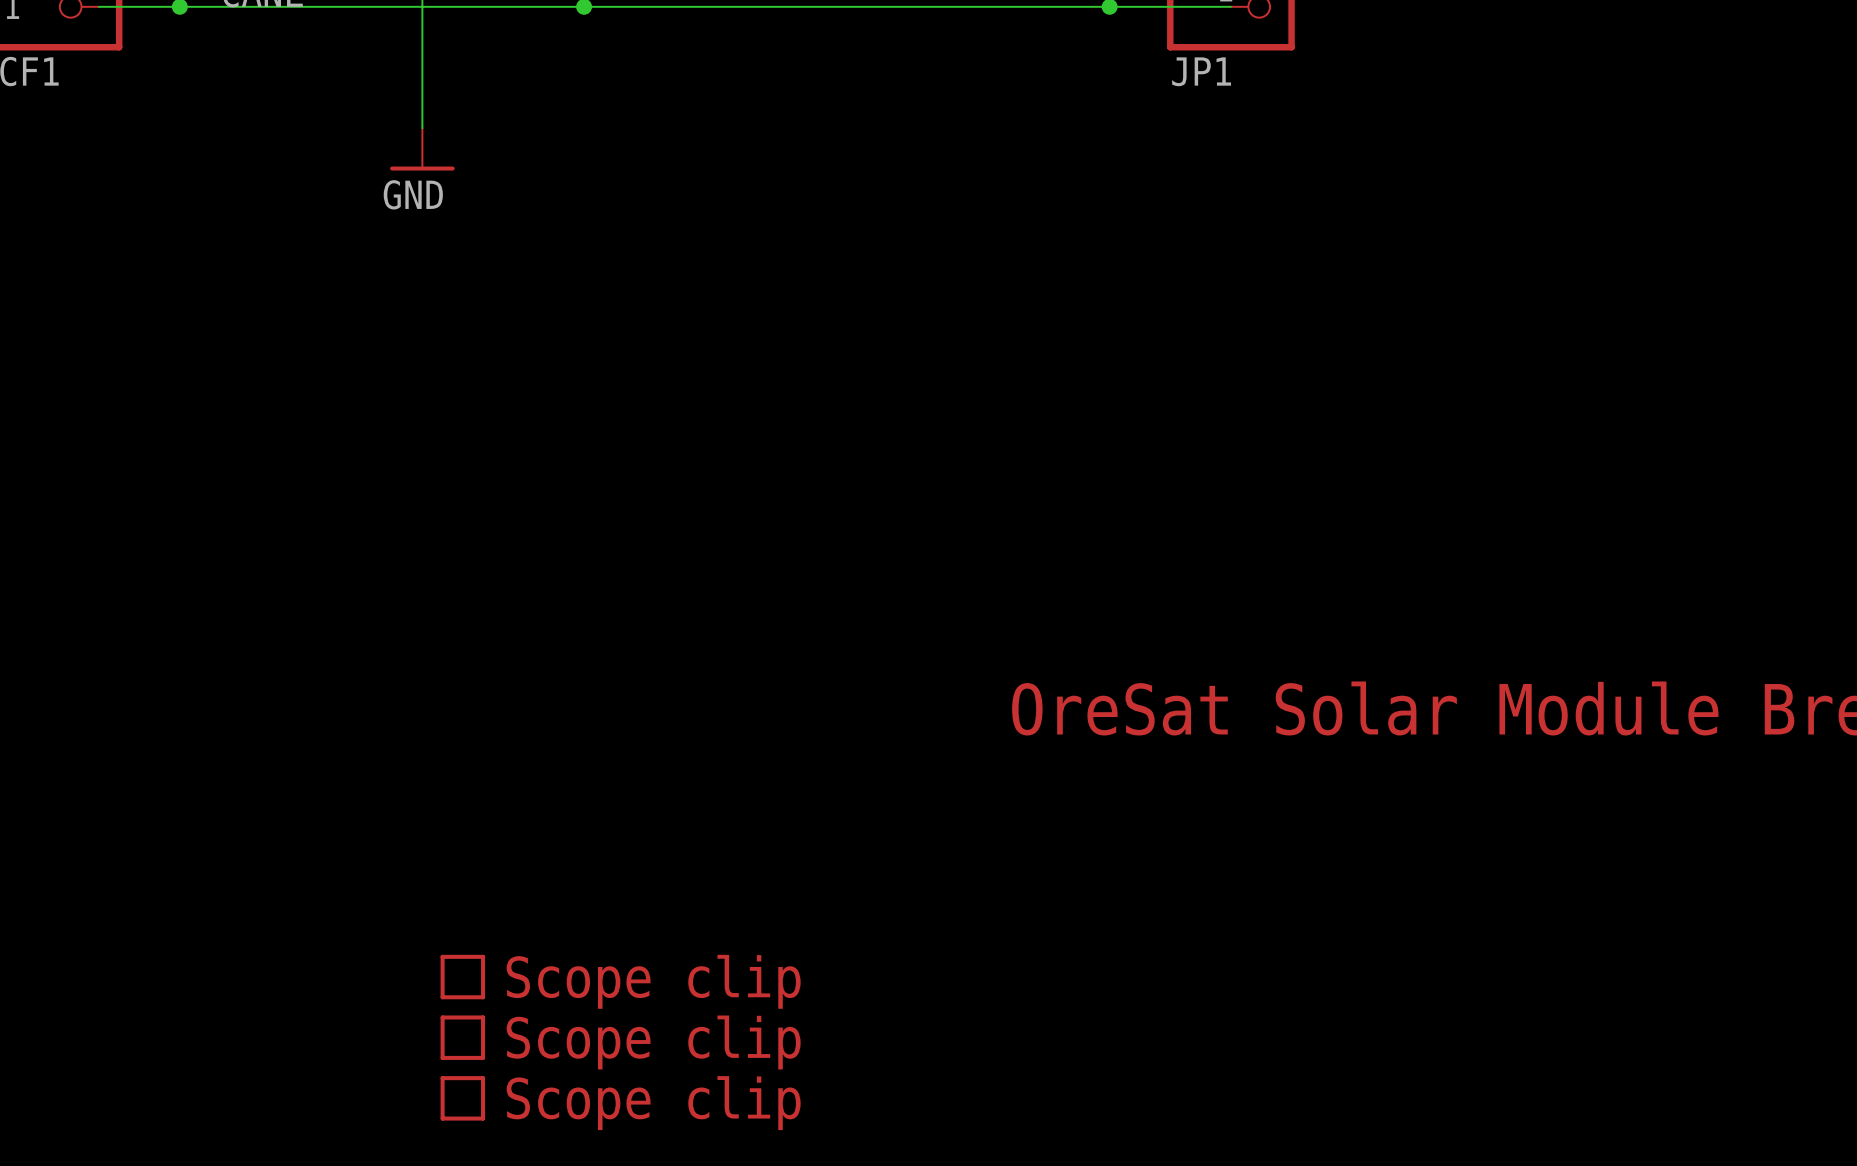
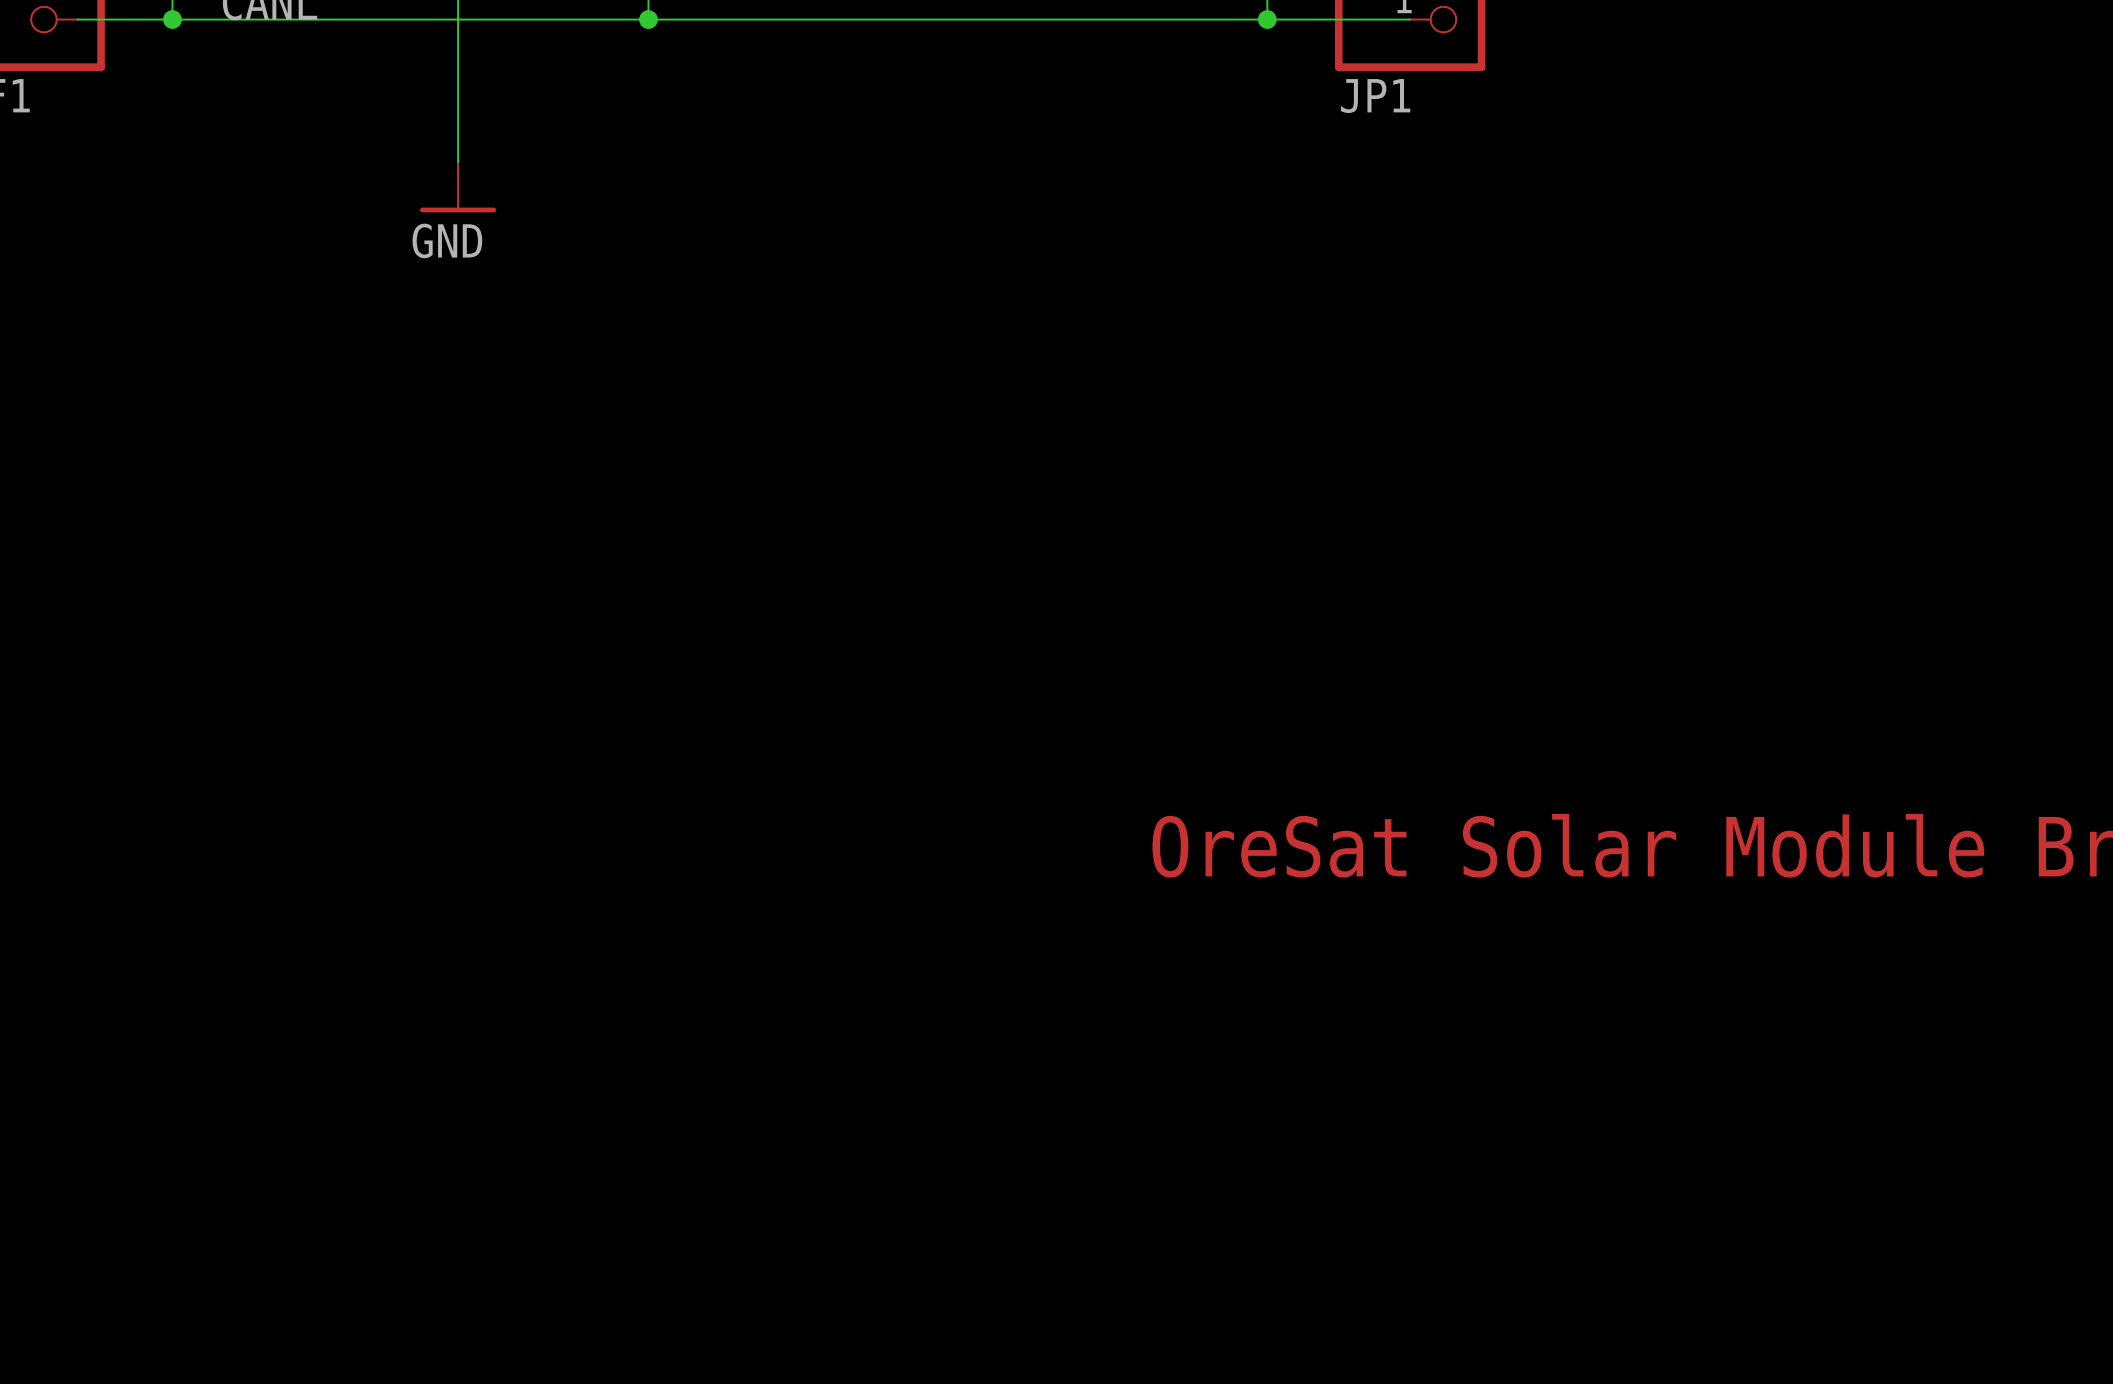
part: (462, 977) -> none
part: (462, 1037) -> none
part: (462, 1098) -> none

